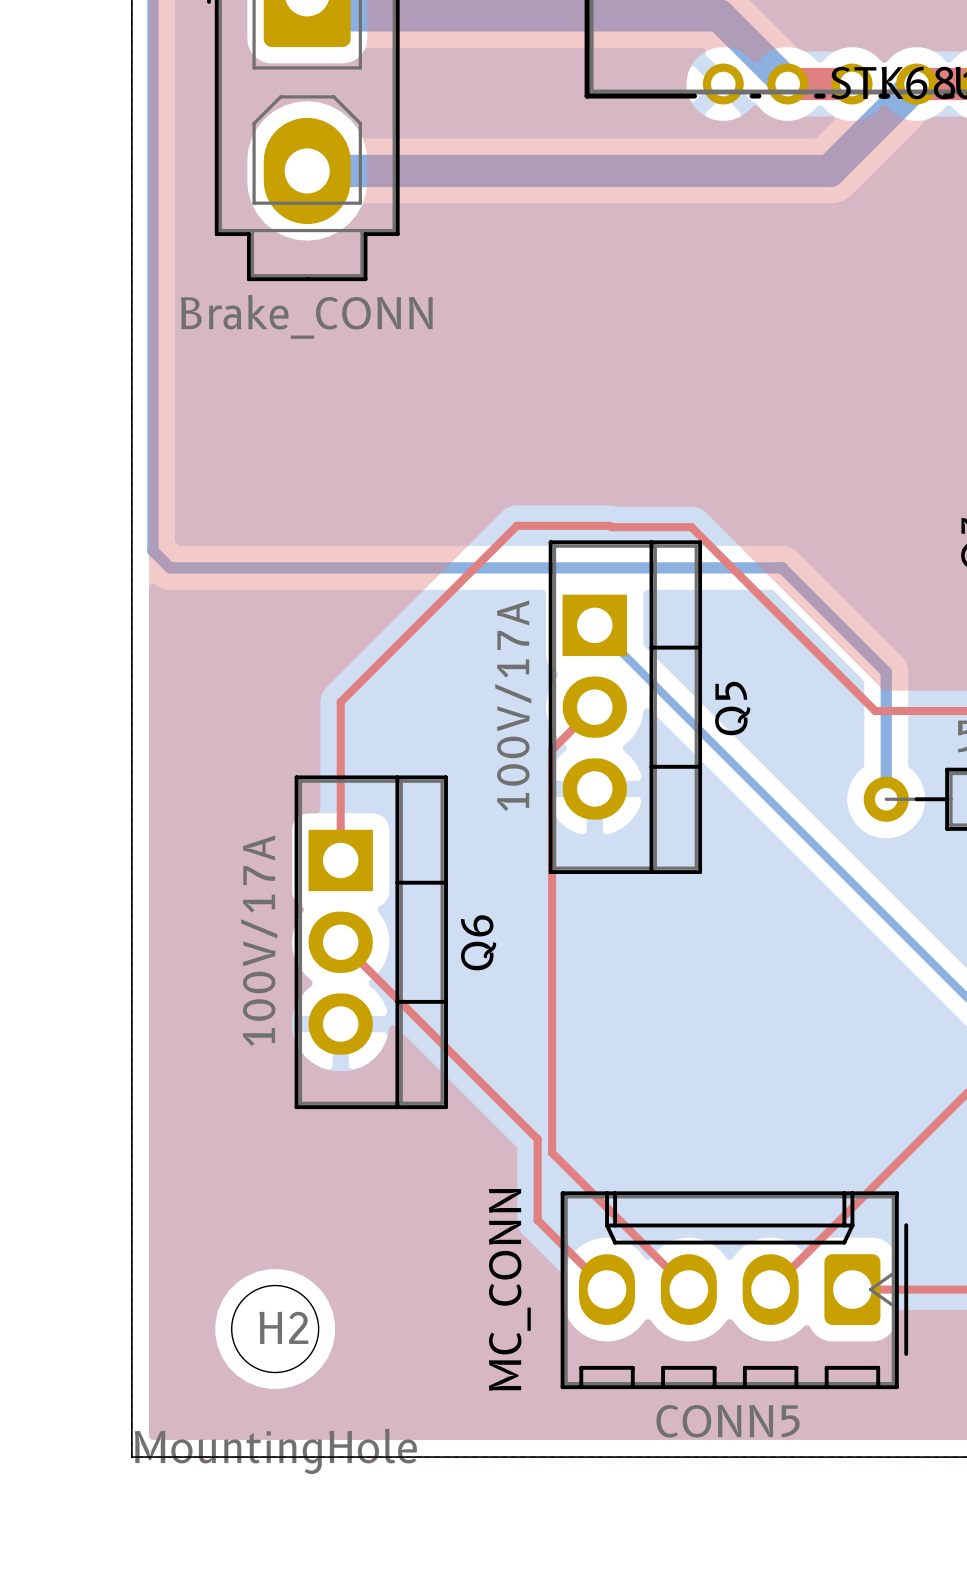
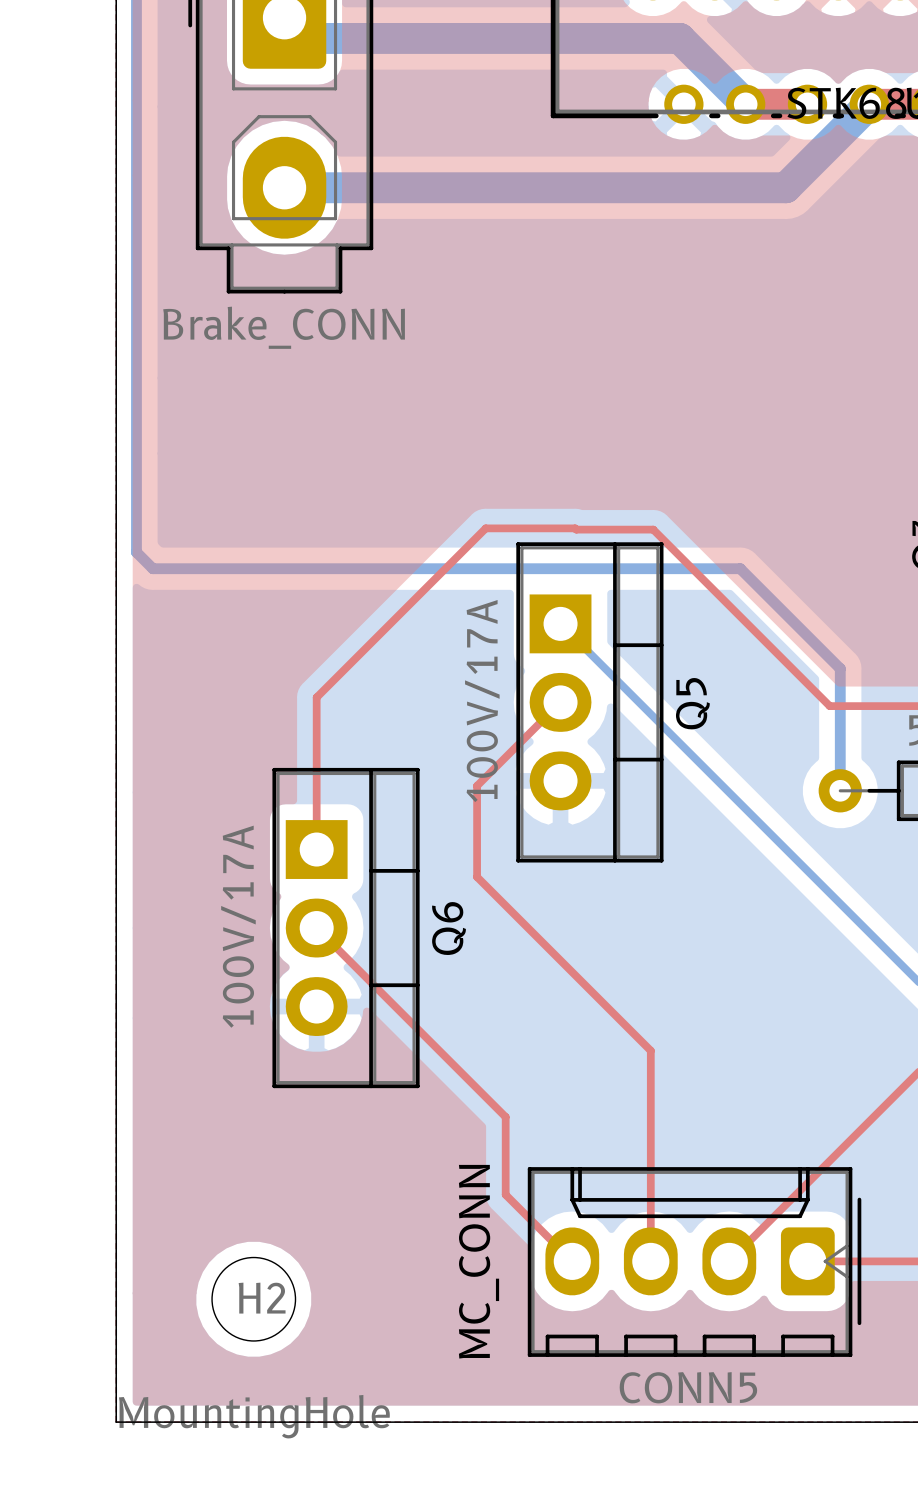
top track: (552, 749) (552, 1152) (688, 1289) -> (519, 743) (477, 785) (477, 877) (650, 1050) (650, 1261)

